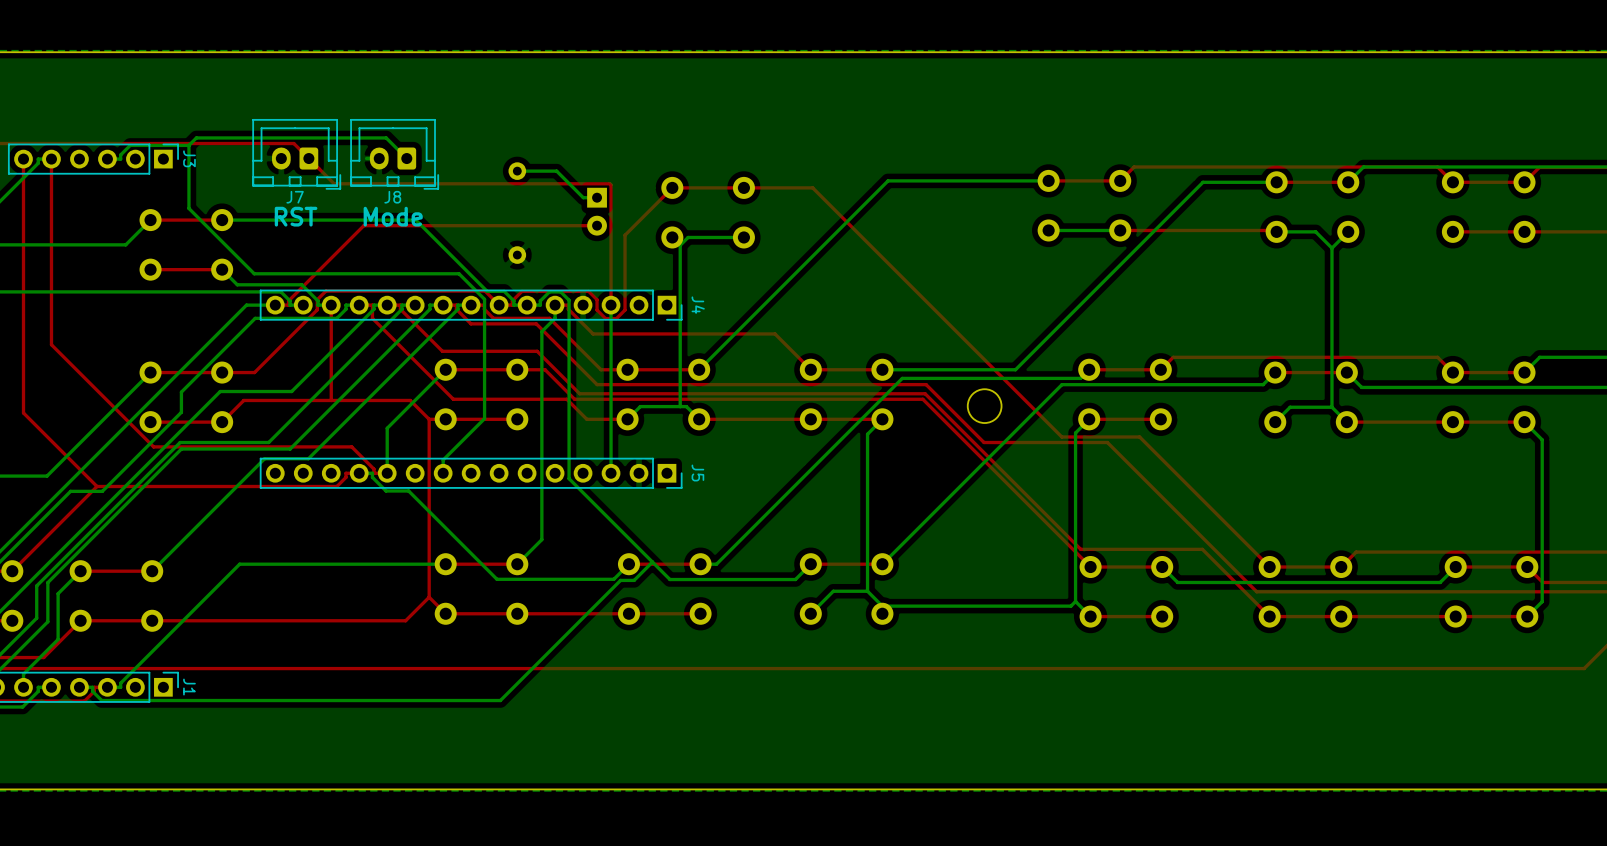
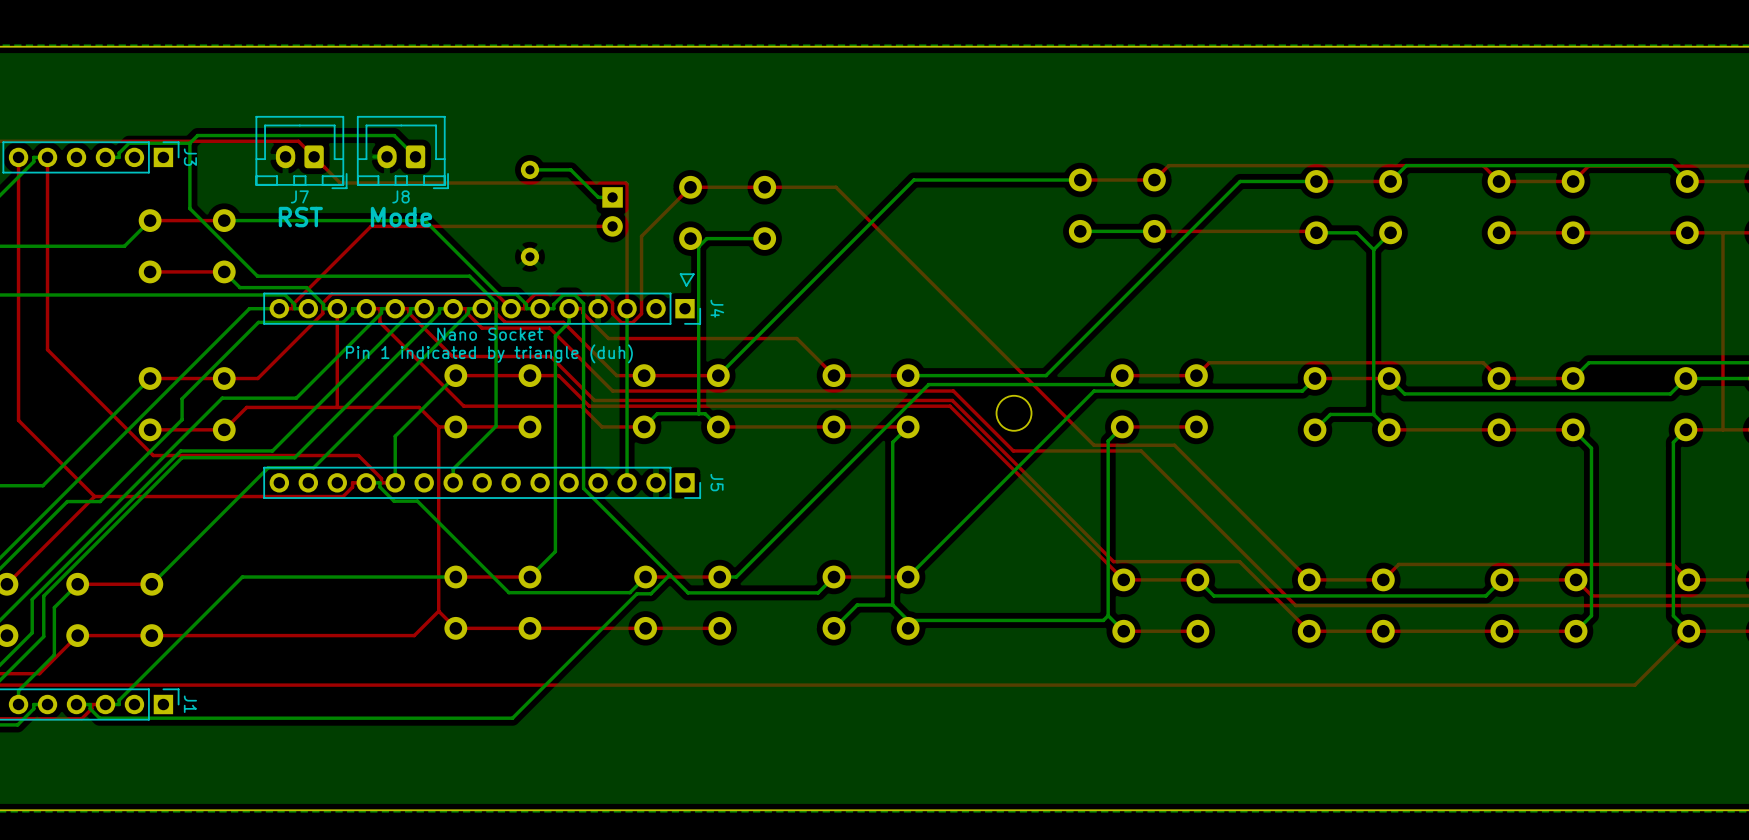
line: none -> (693, 274) (680, 274) (686, 285) (693, 274)
text: none -> Nano Socket (490, 334)
text: none -> Pin 1 indicated by triangle (duh) (489, 353)

